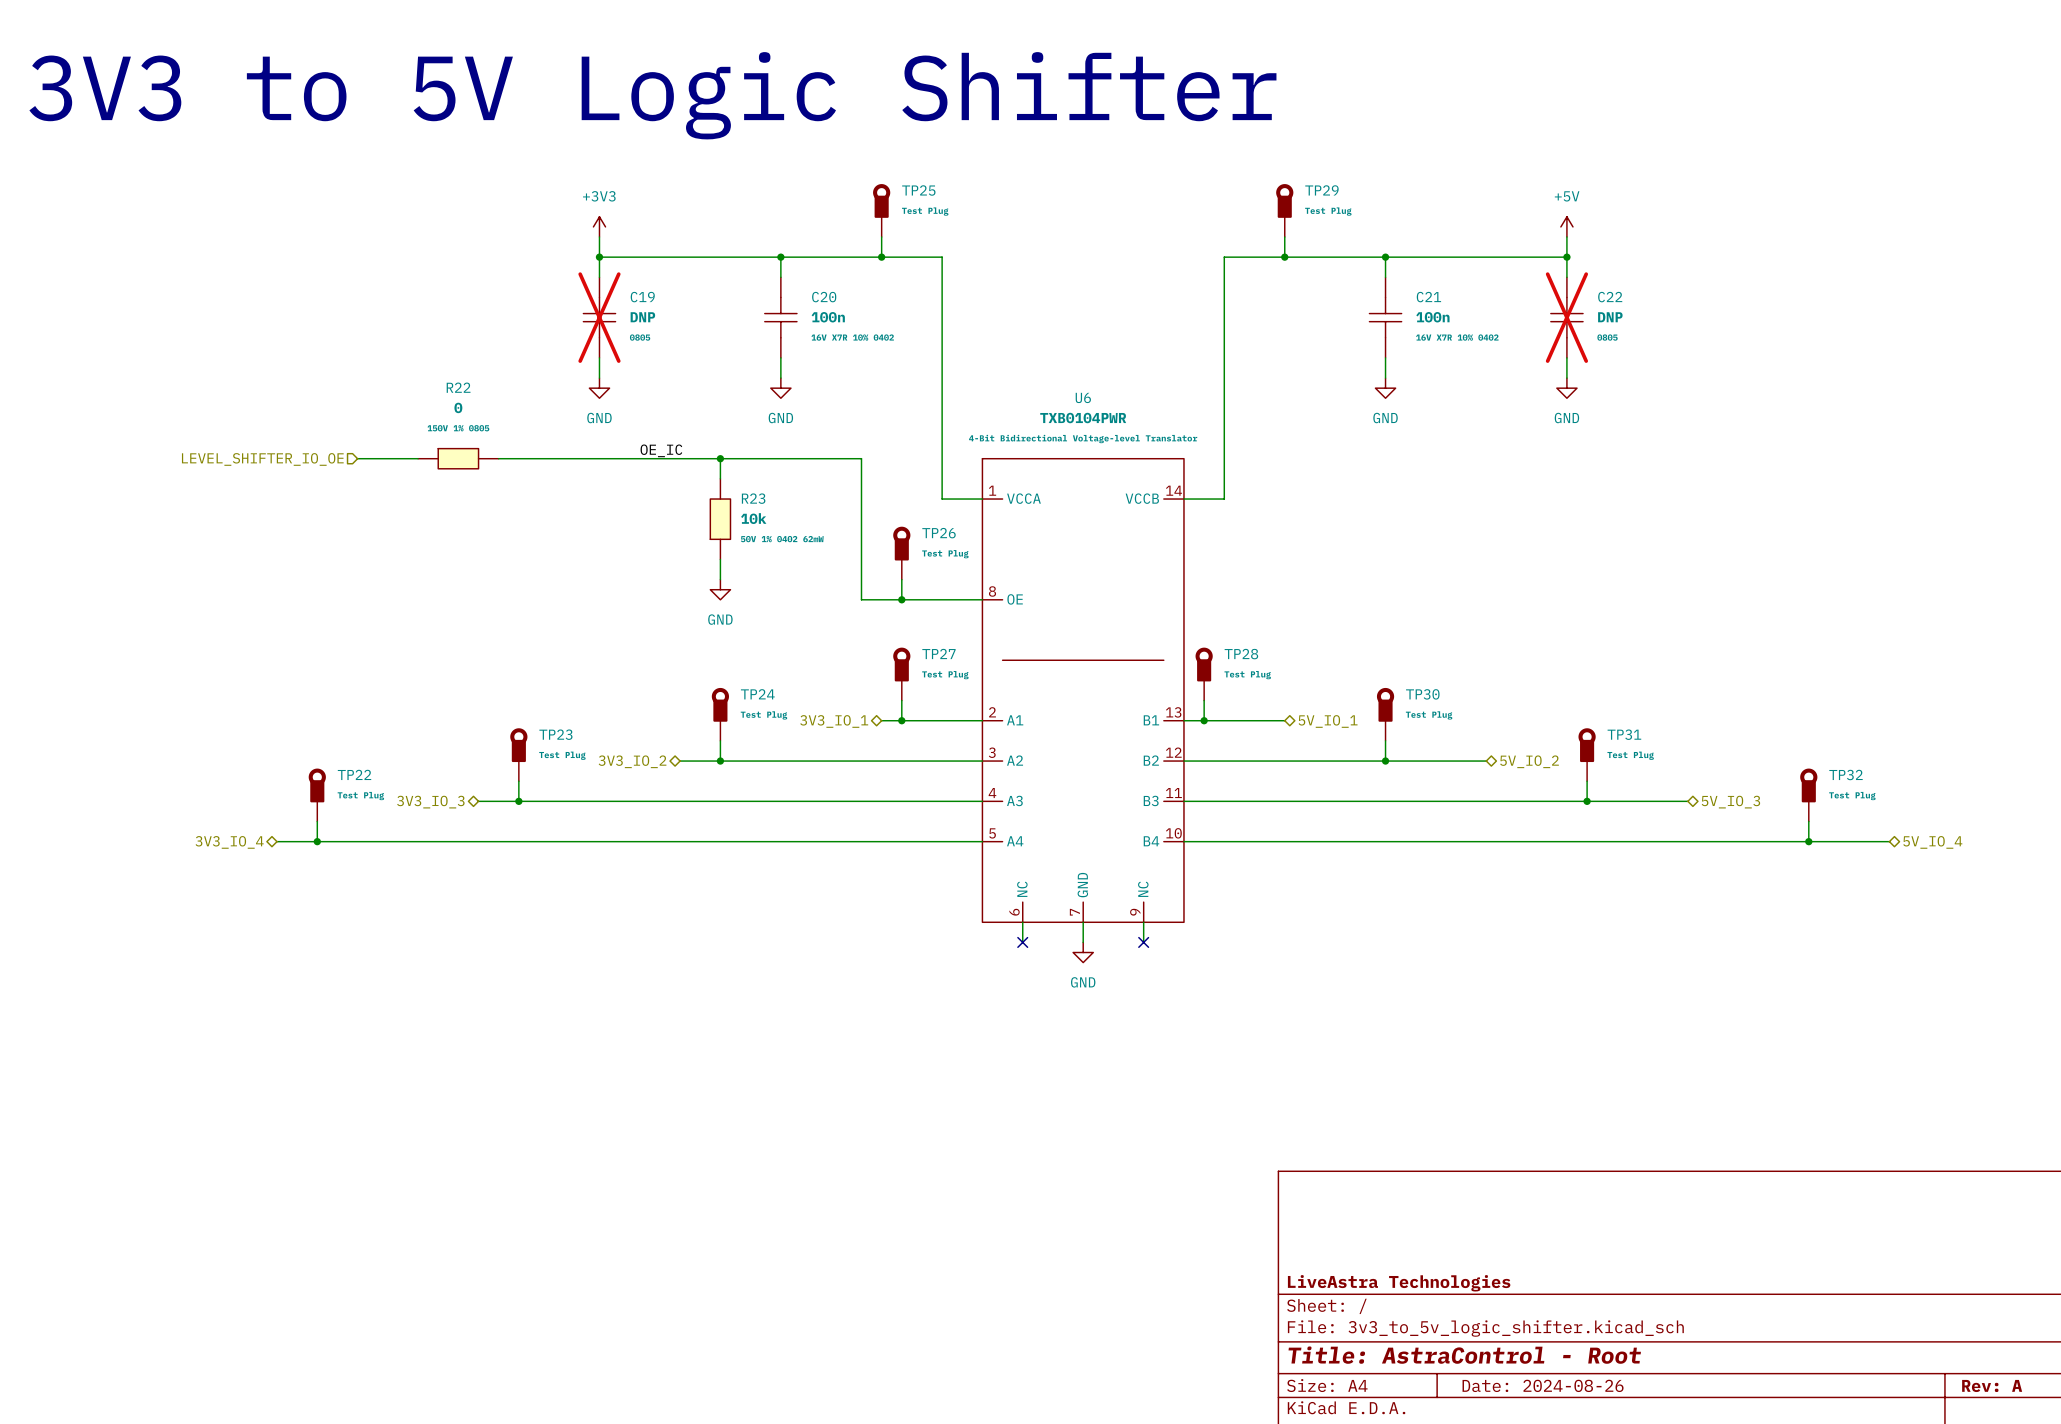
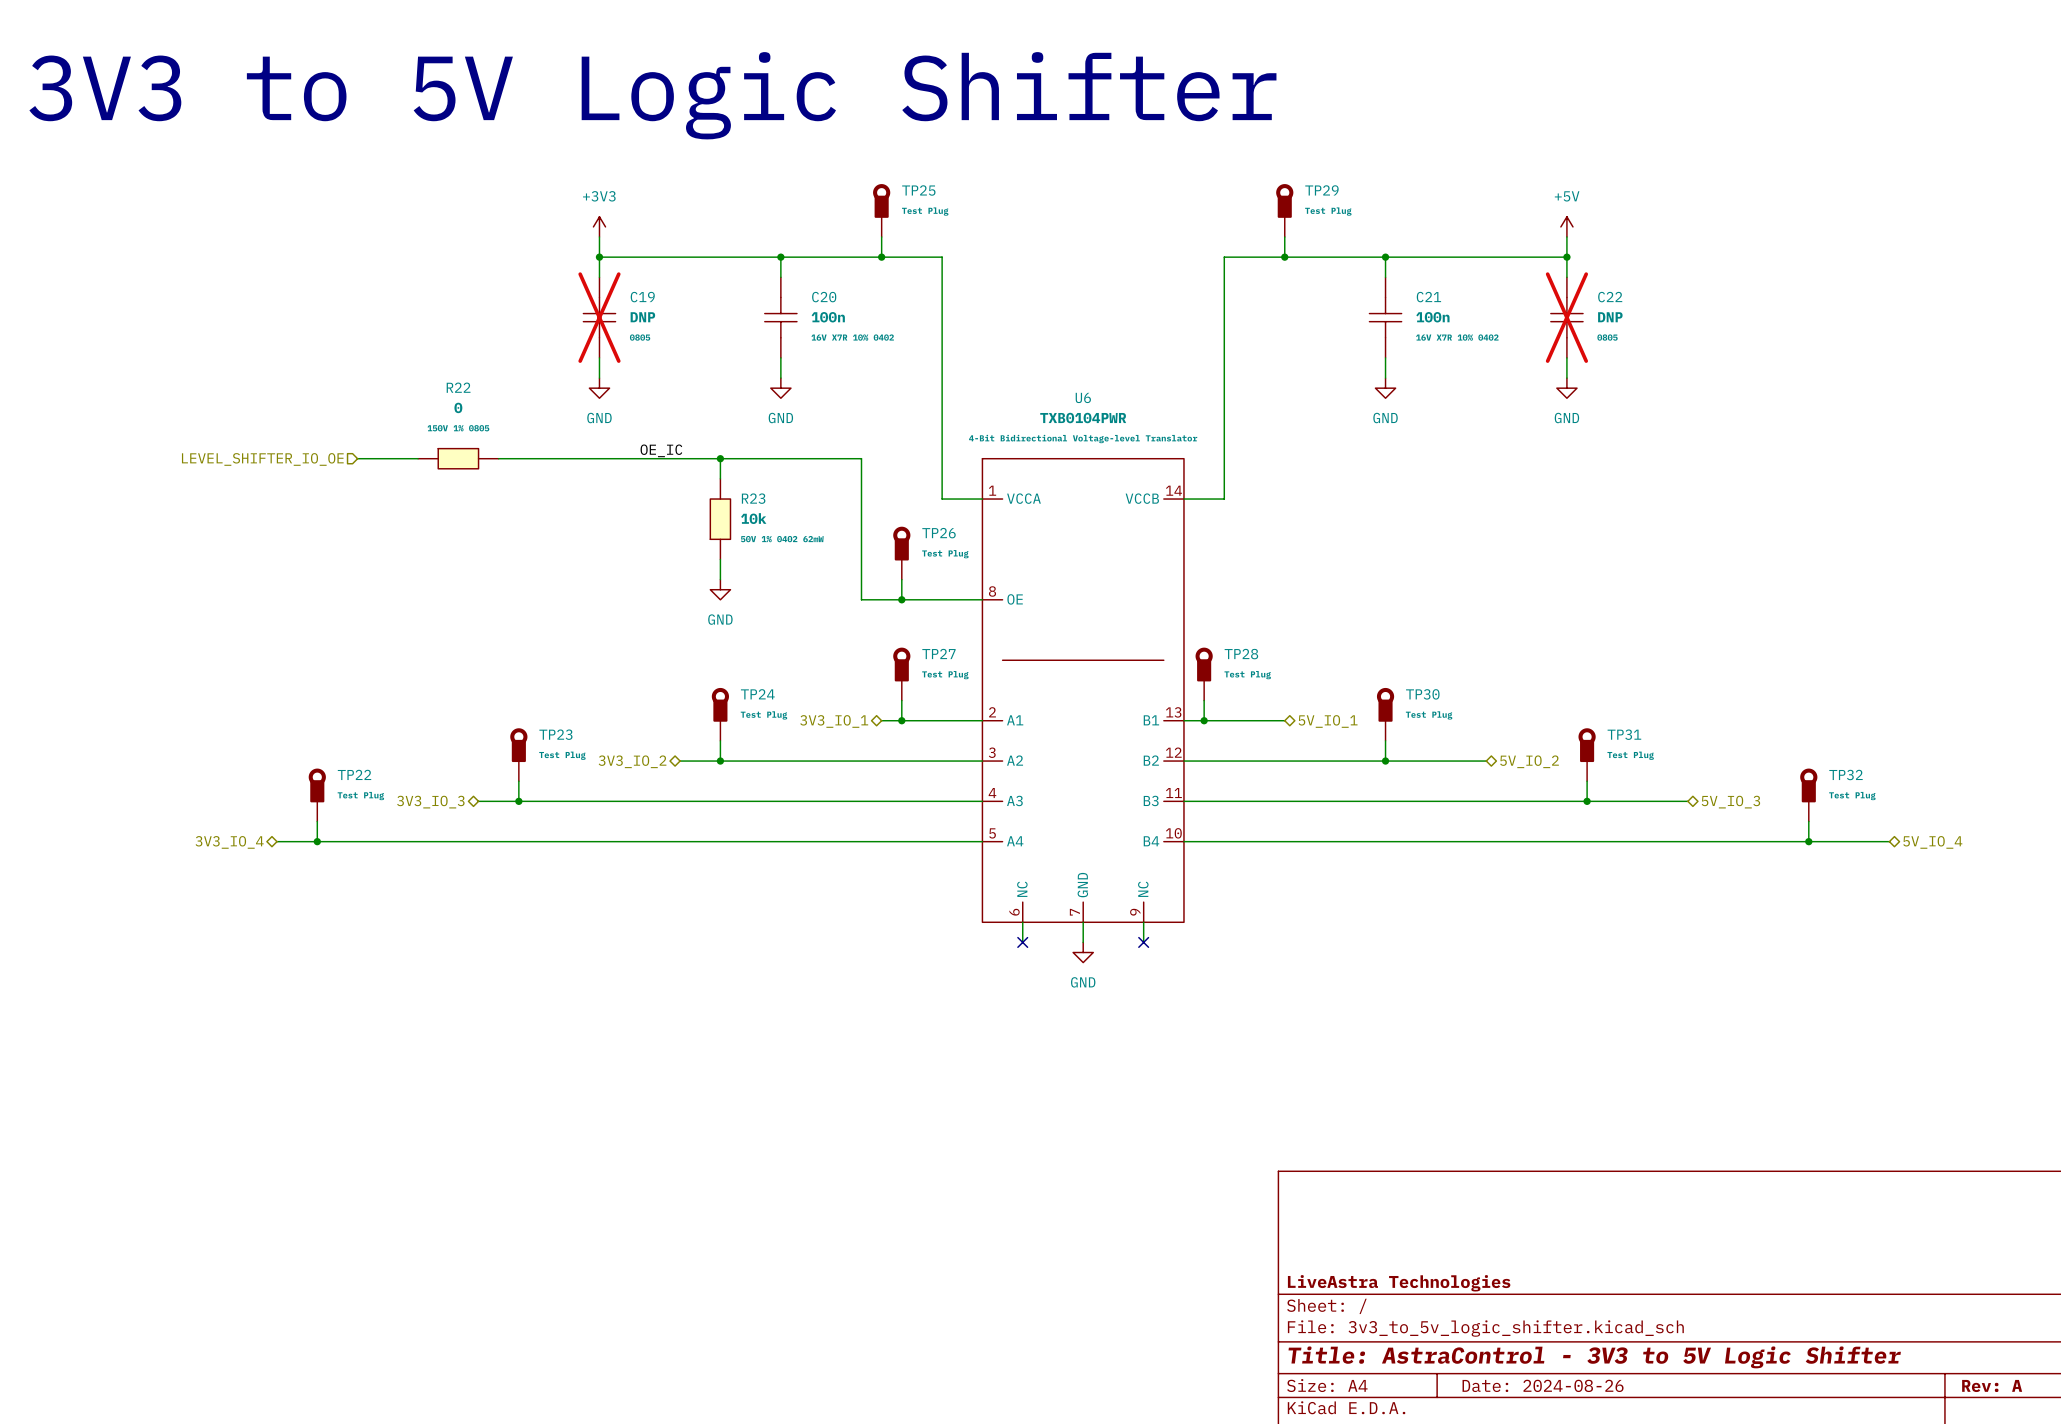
title block: Title: AstraControl - Root (1464, 1355) -> Title: AstraControl - 3V3 to 5V Logic Shifter (1594, 1357)

